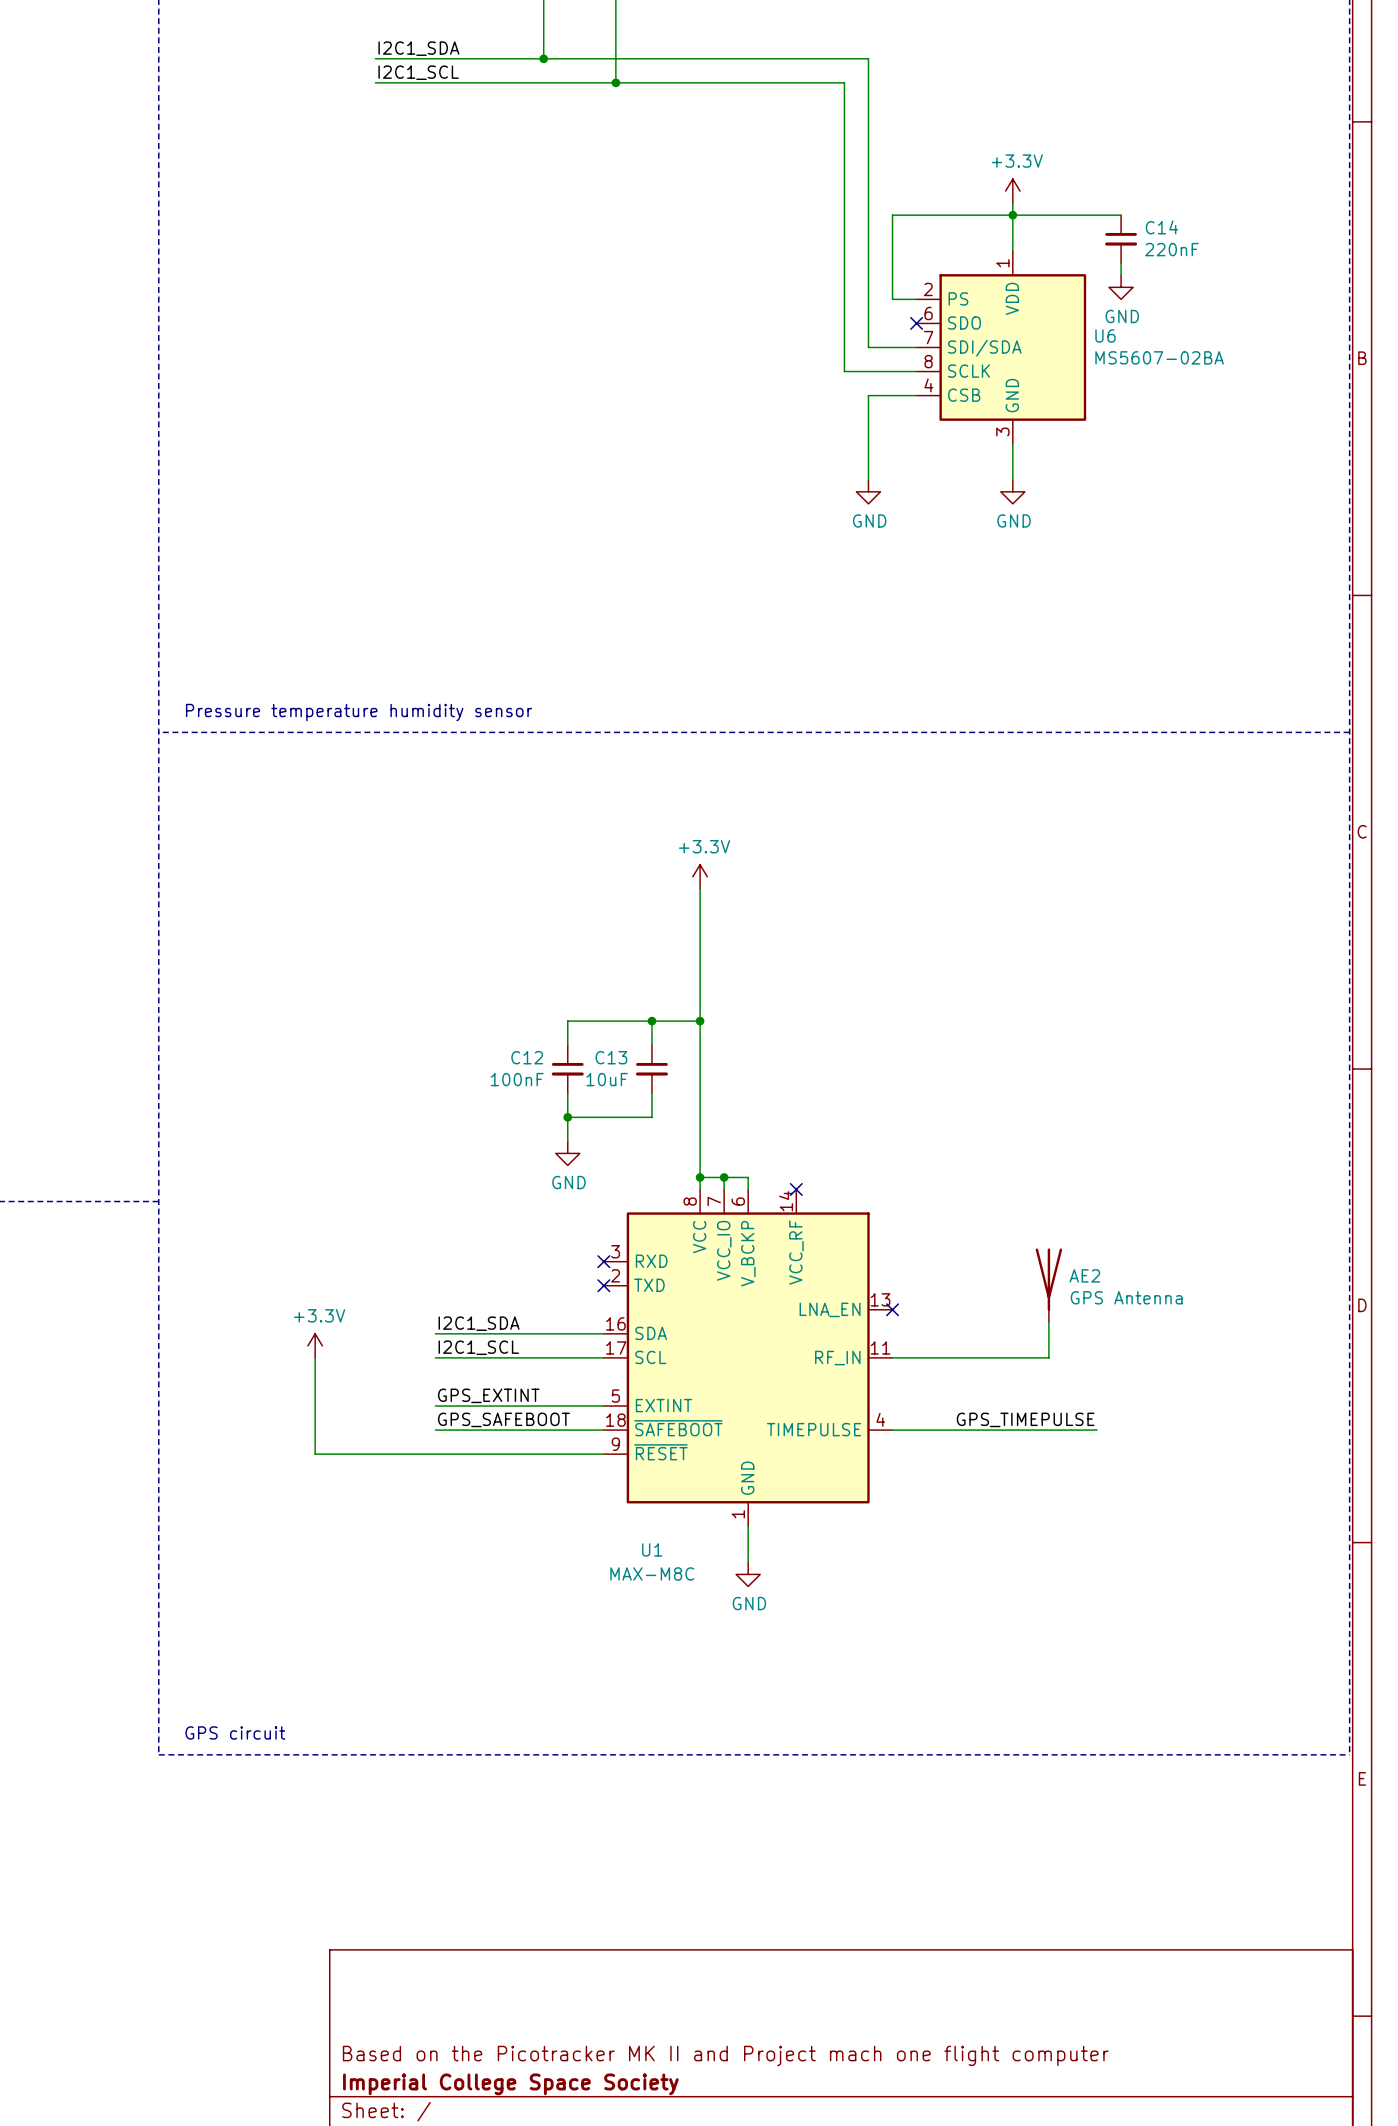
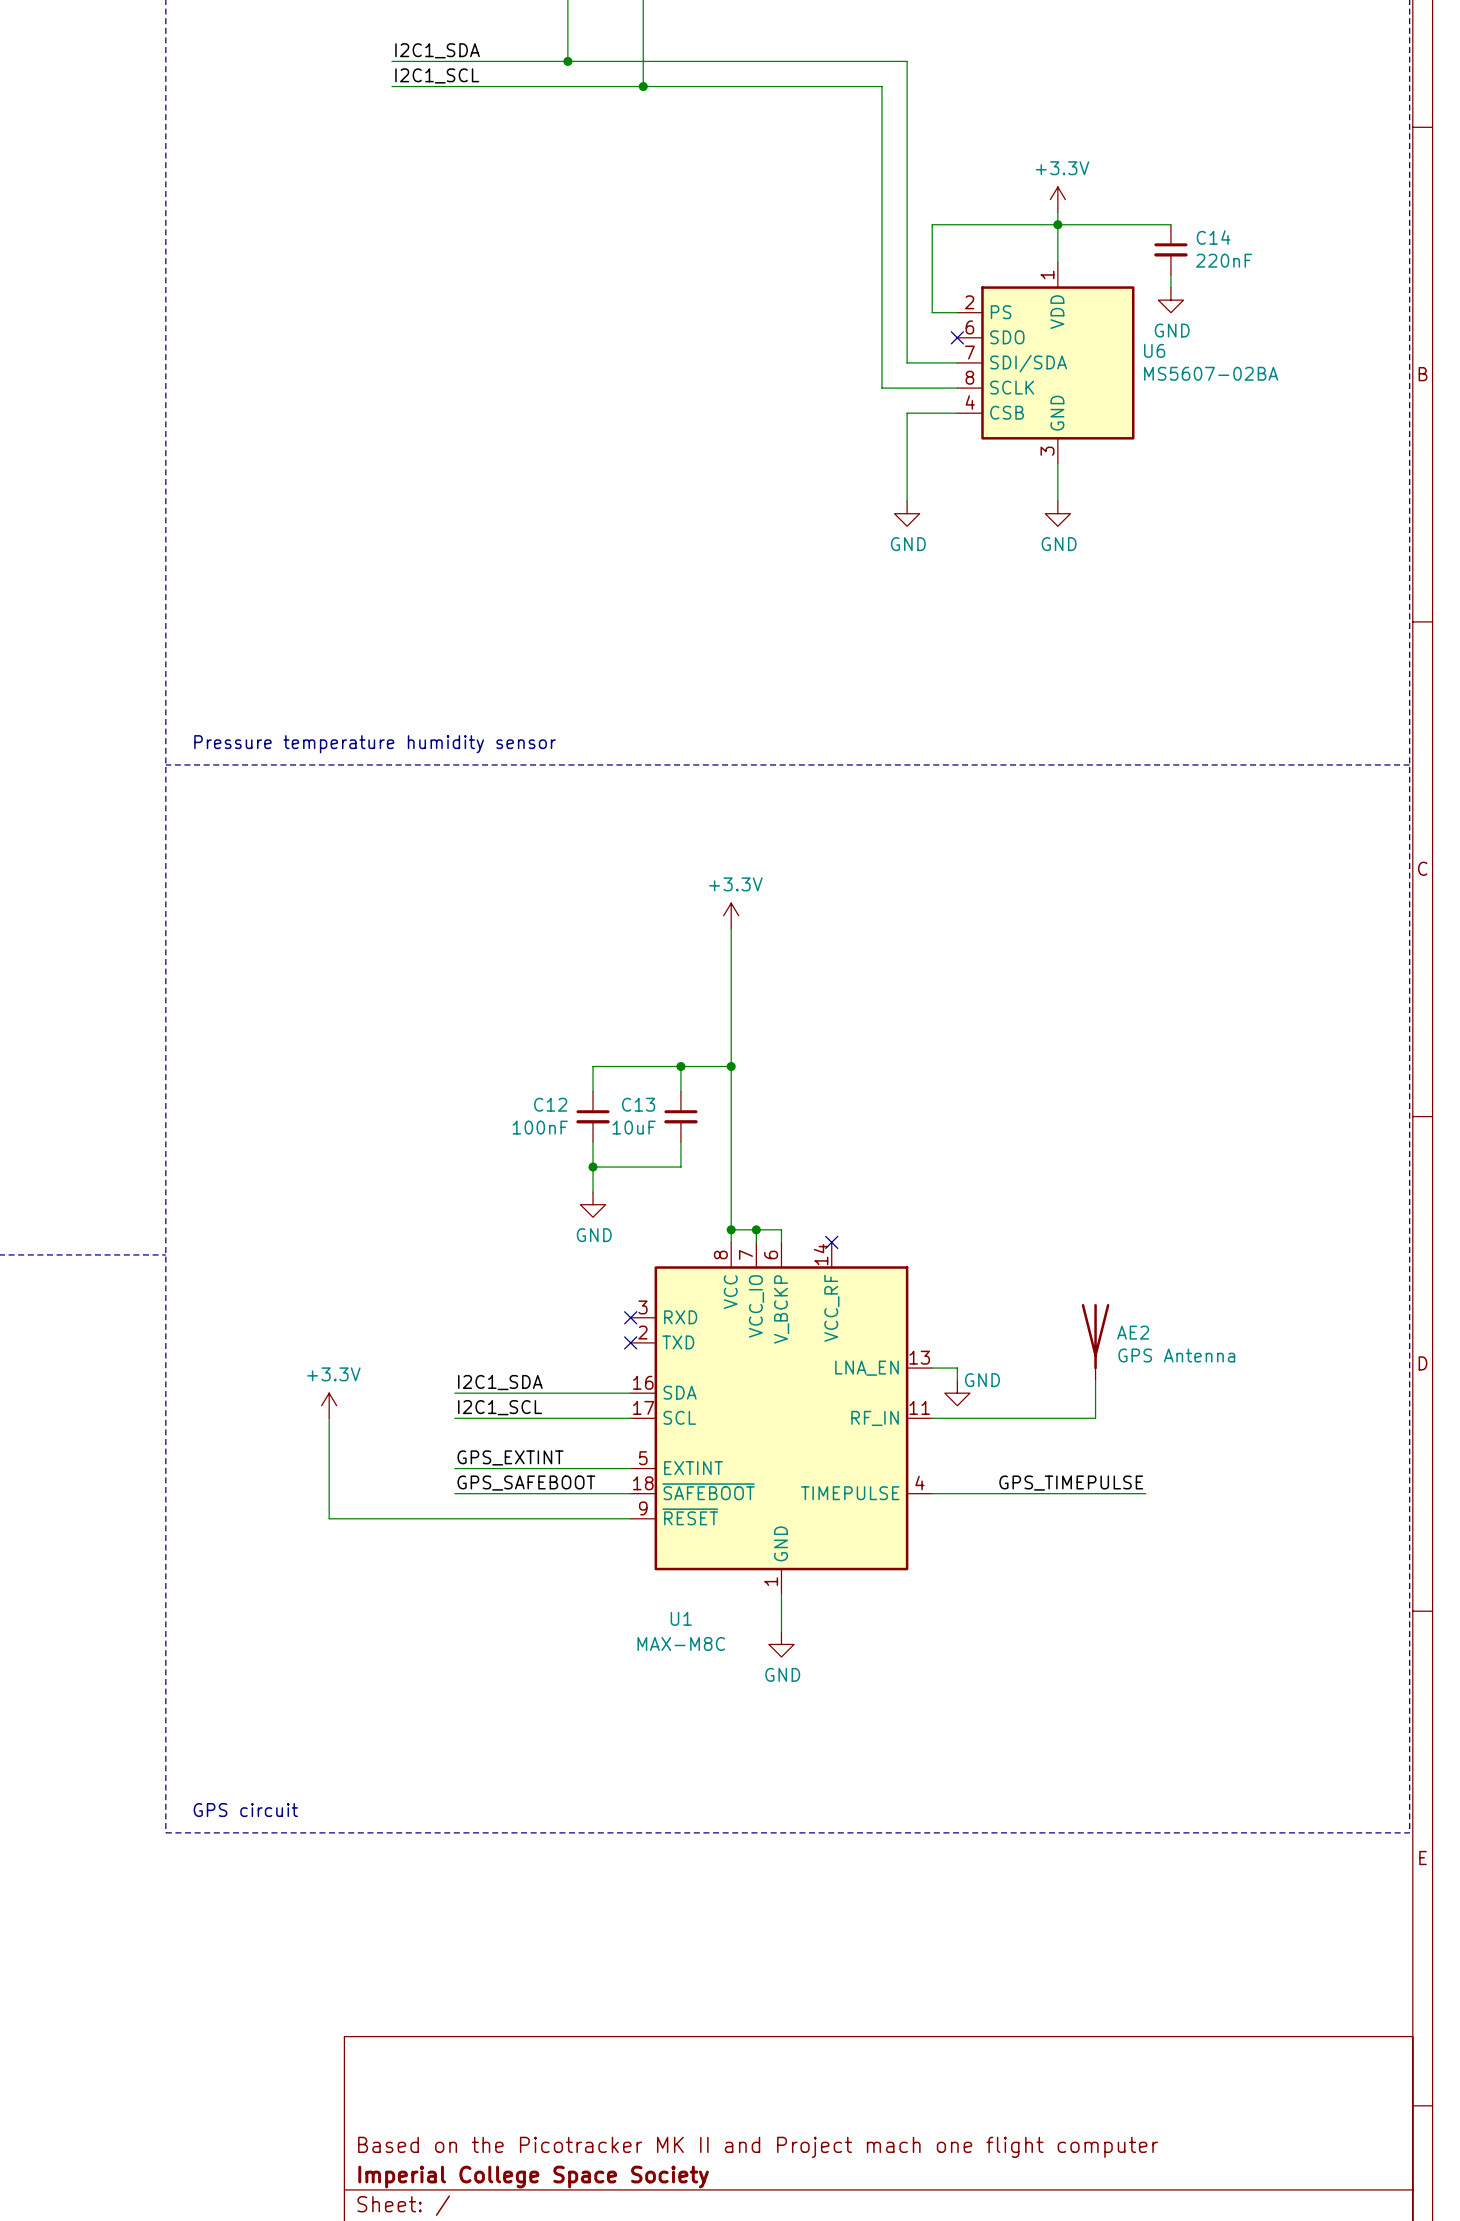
wire: none -> (932, 1368) (957, 1368) (957, 1380)
no-connect mark: (892, 1309) -> none
power symbol: none -> GND (957, 1393)

